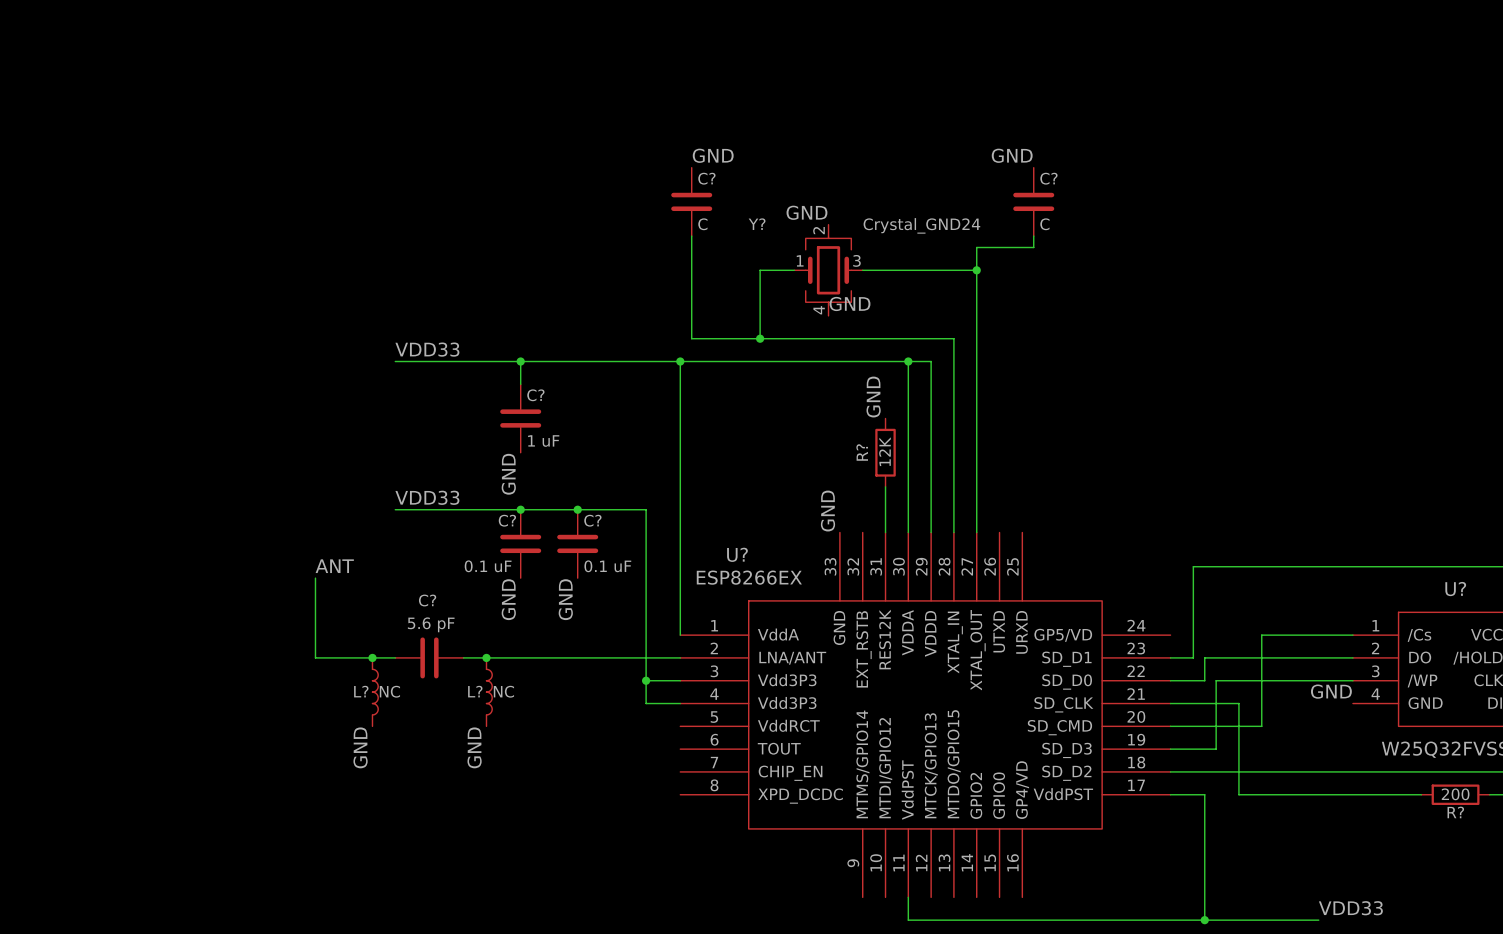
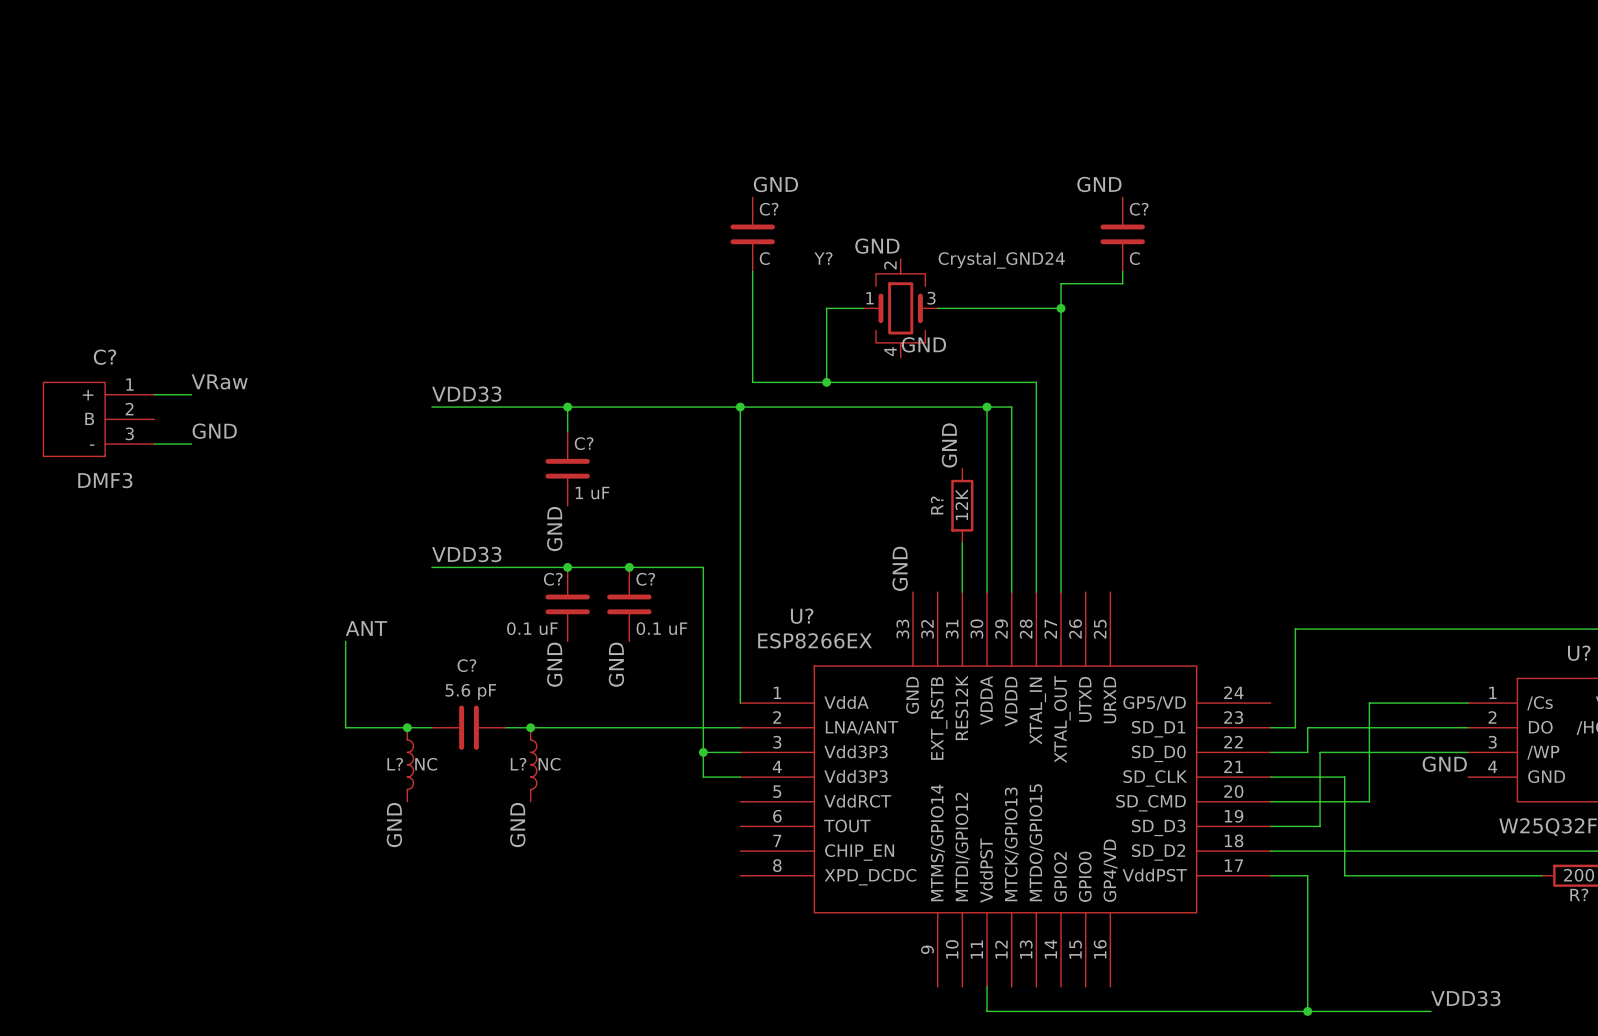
label: none -> VRaw (219, 381)
wire: none -> (154, 394) (191, 394)
C?: none -> DMF3 (98, 419)
label: none -> GND (214, 431)
wire: none -> (154, 444) (191, 444)

